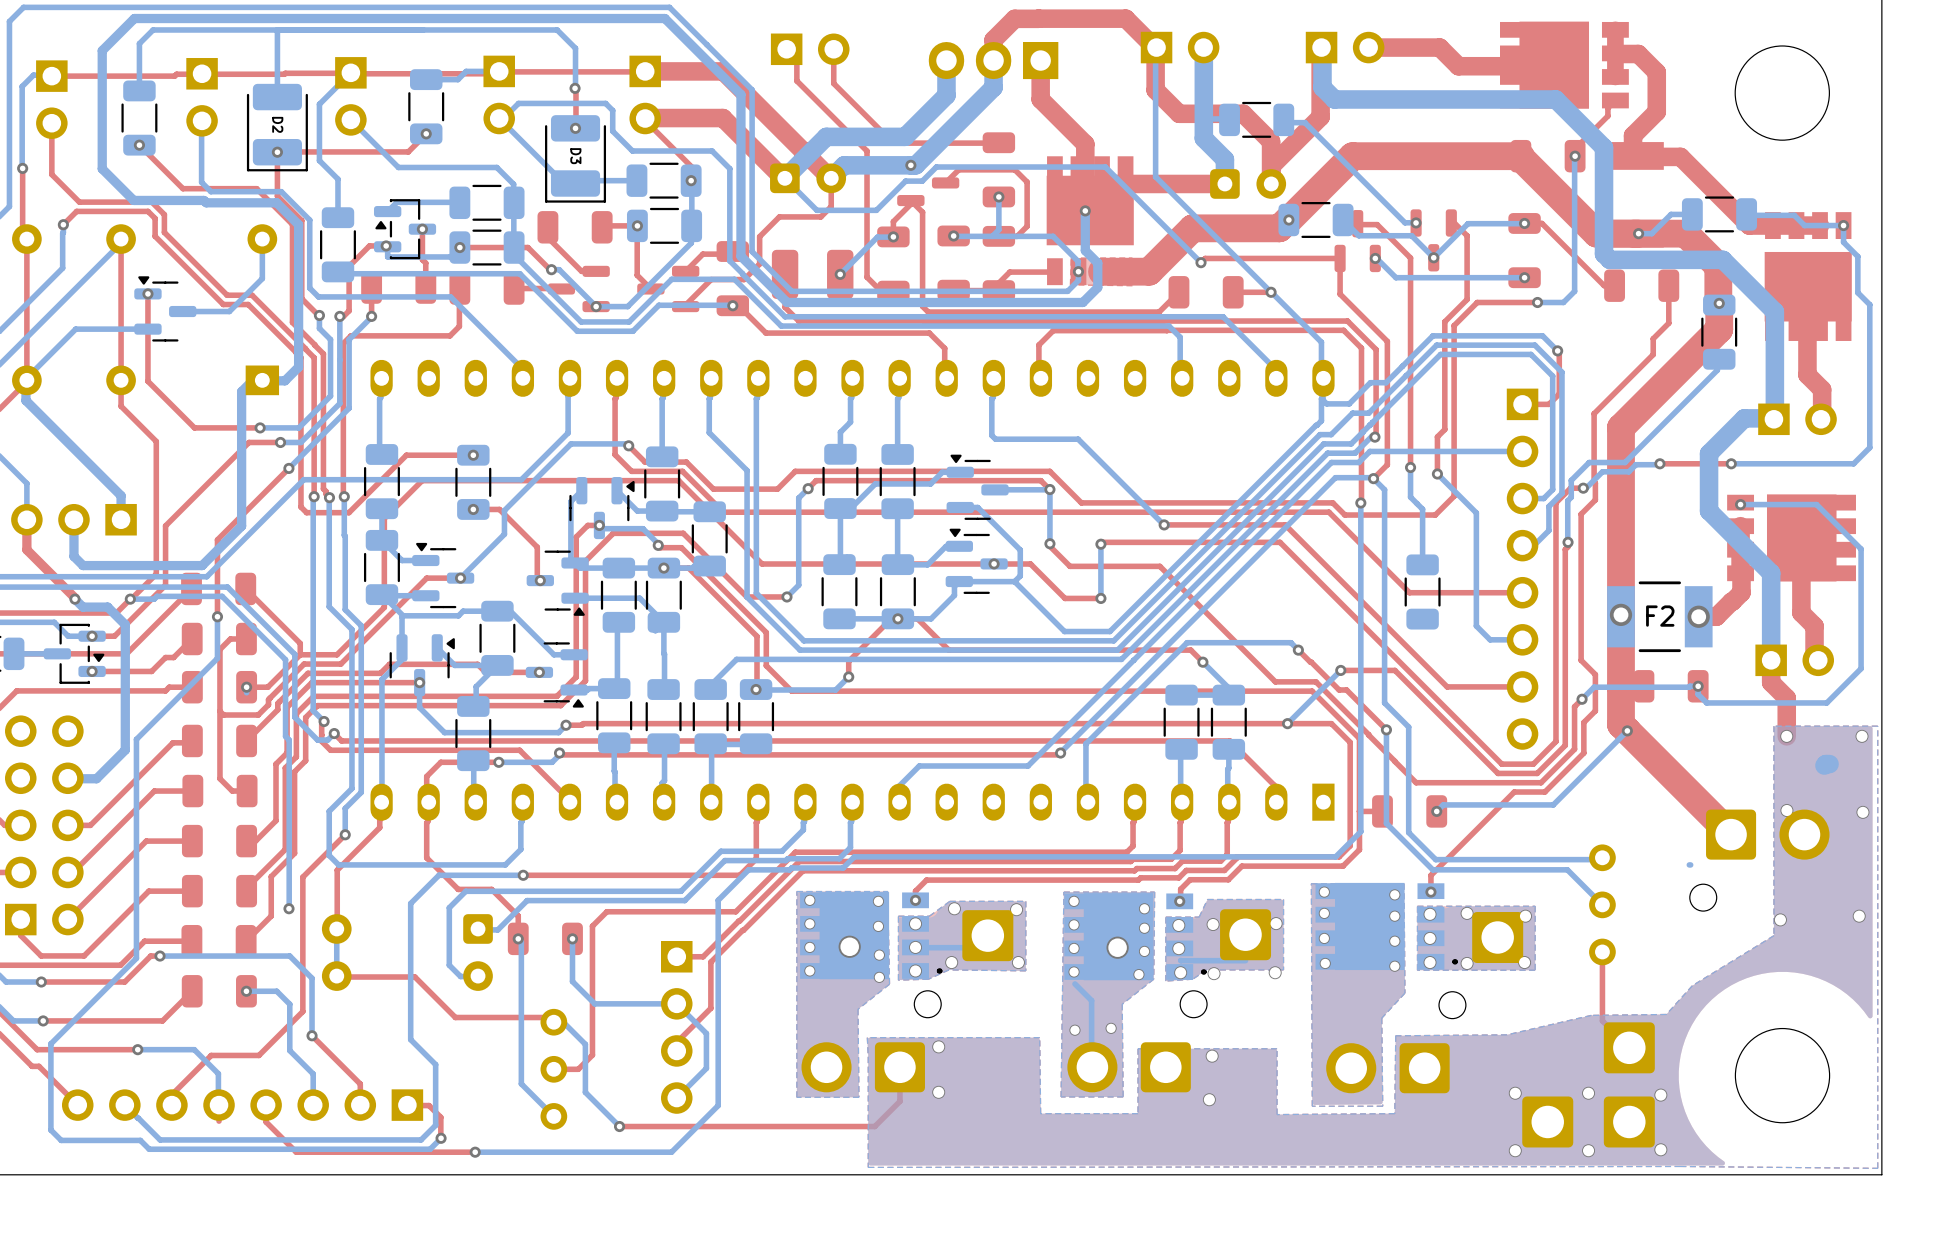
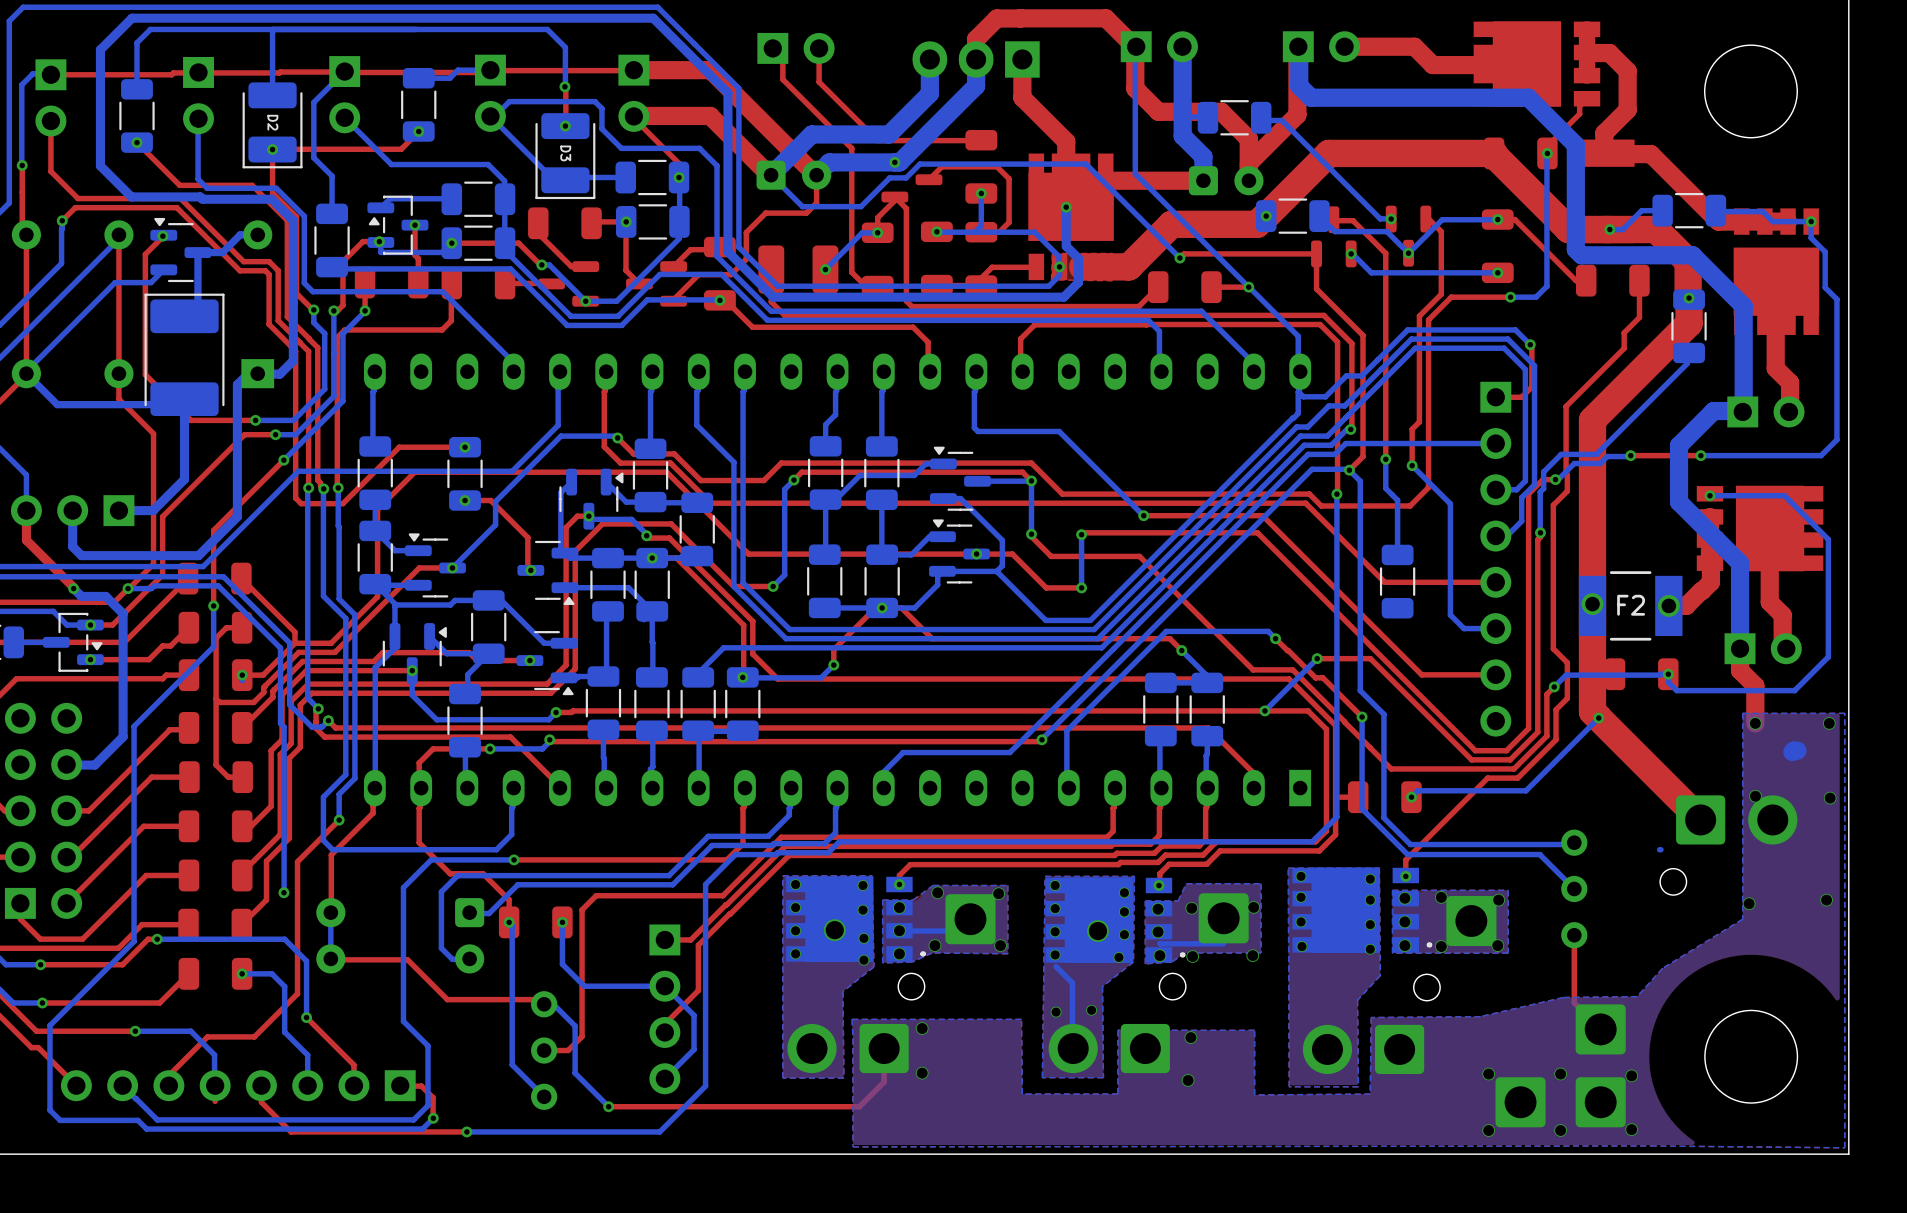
top track: (151, 202) (164, 214) (164, 232) (227, 295) (252, 295) (283, 326) -> (149, 198) (180, 198) (243, 261) (269, 261) (278, 270) (278, 320)
top track: (148, 211) (155, 218) (155, 236) (223, 304) (248, 304) (273, 330) -> (145, 207) (176, 207) (239, 270) (265, 270) (269, 274) (269, 324)
top track: none -> (163, 235) (145, 254) (145, 288)
bottom track: (262, 239) (262, 278) (229, 311) (182, 311) -> (257, 234) (240, 234) (222, 252) (197, 252) (197, 302) (184, 316)
via position: (147, 293) -> (162, 236)
part position: (165, 308) -> (180, 250)
bottom track: (147, 329) (75, 329) -> (163, 269) (151, 282) (115, 282) (74, 323)
part: none -> (184, 354)
bottom track: (25, 381) (25, 400) (121, 495) (121, 519) -> (26, 373) (57, 404) (179, 404) (184, 399) (184, 479) (153, 510) (118, 510)

